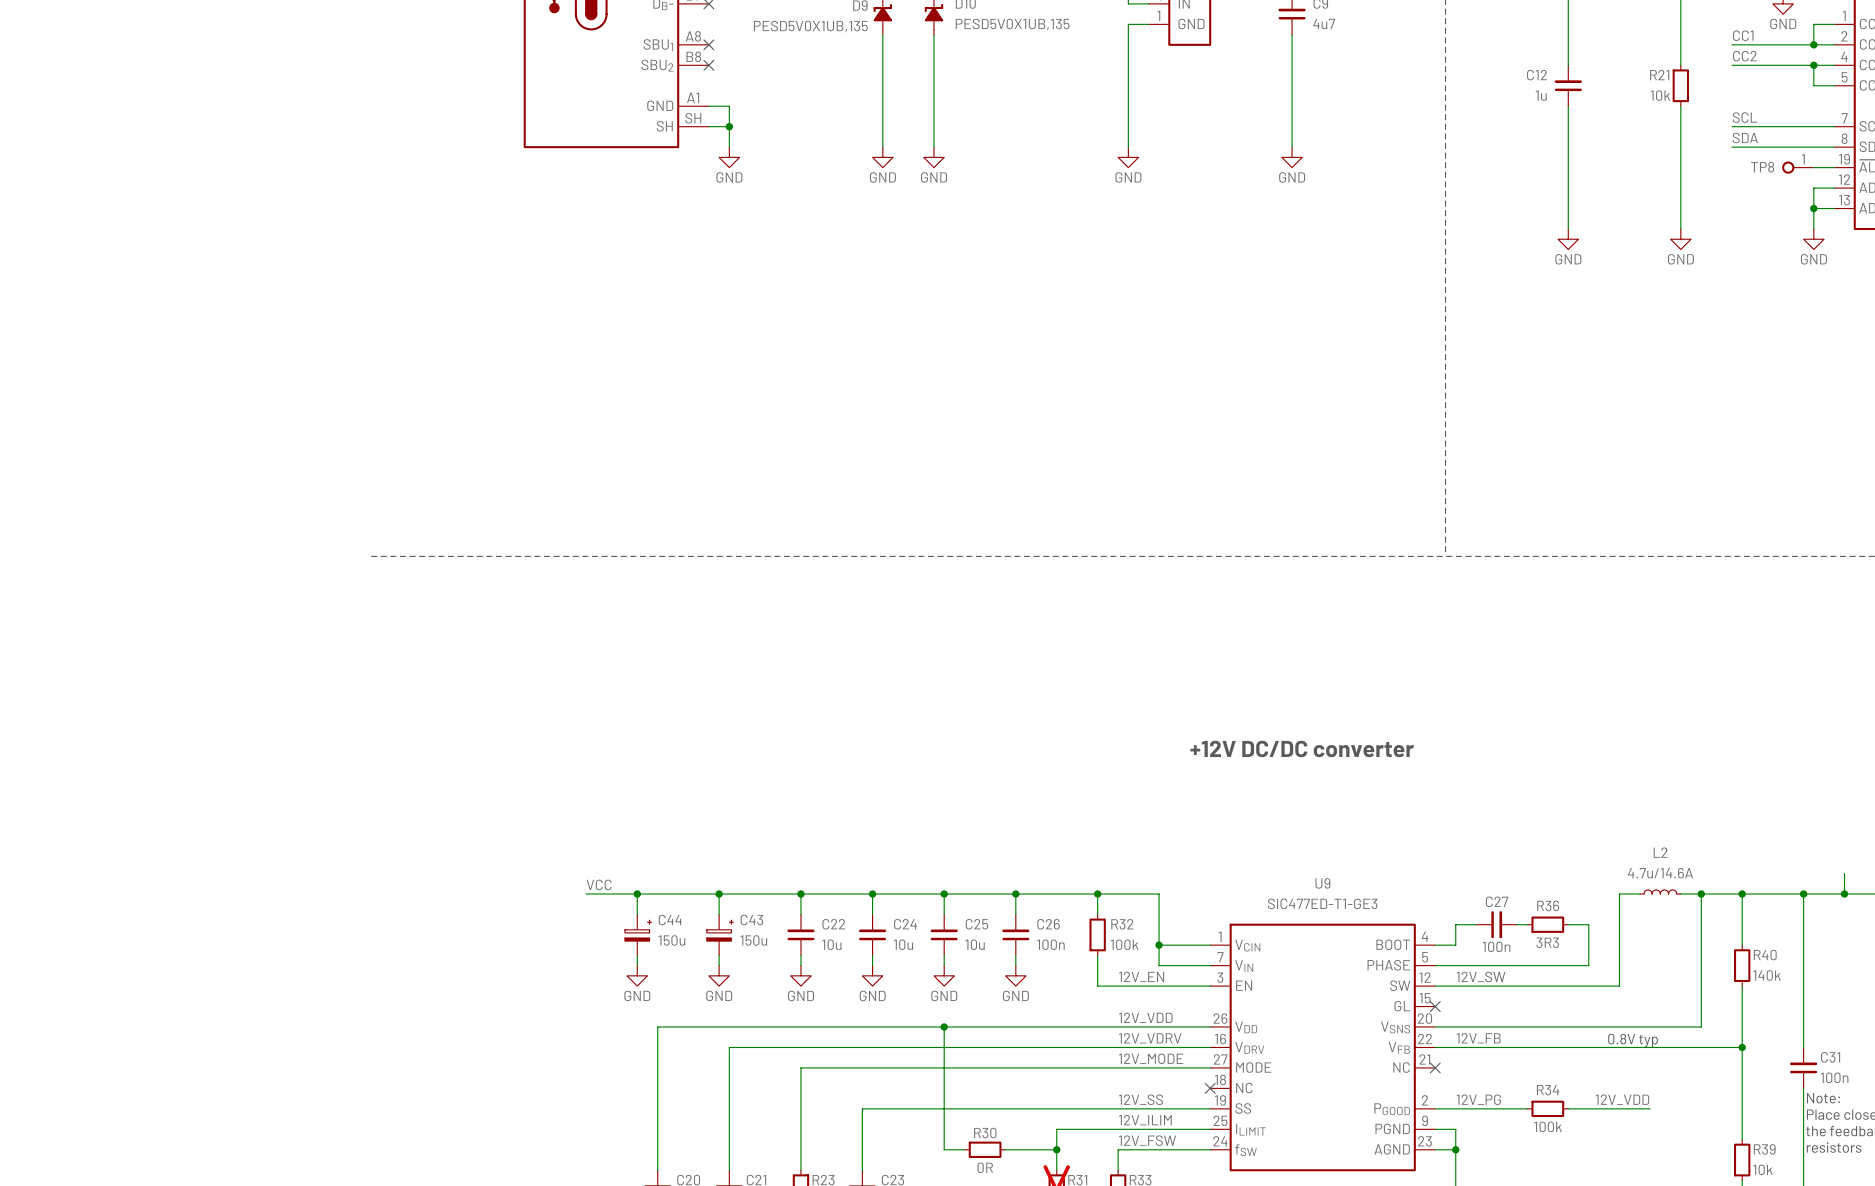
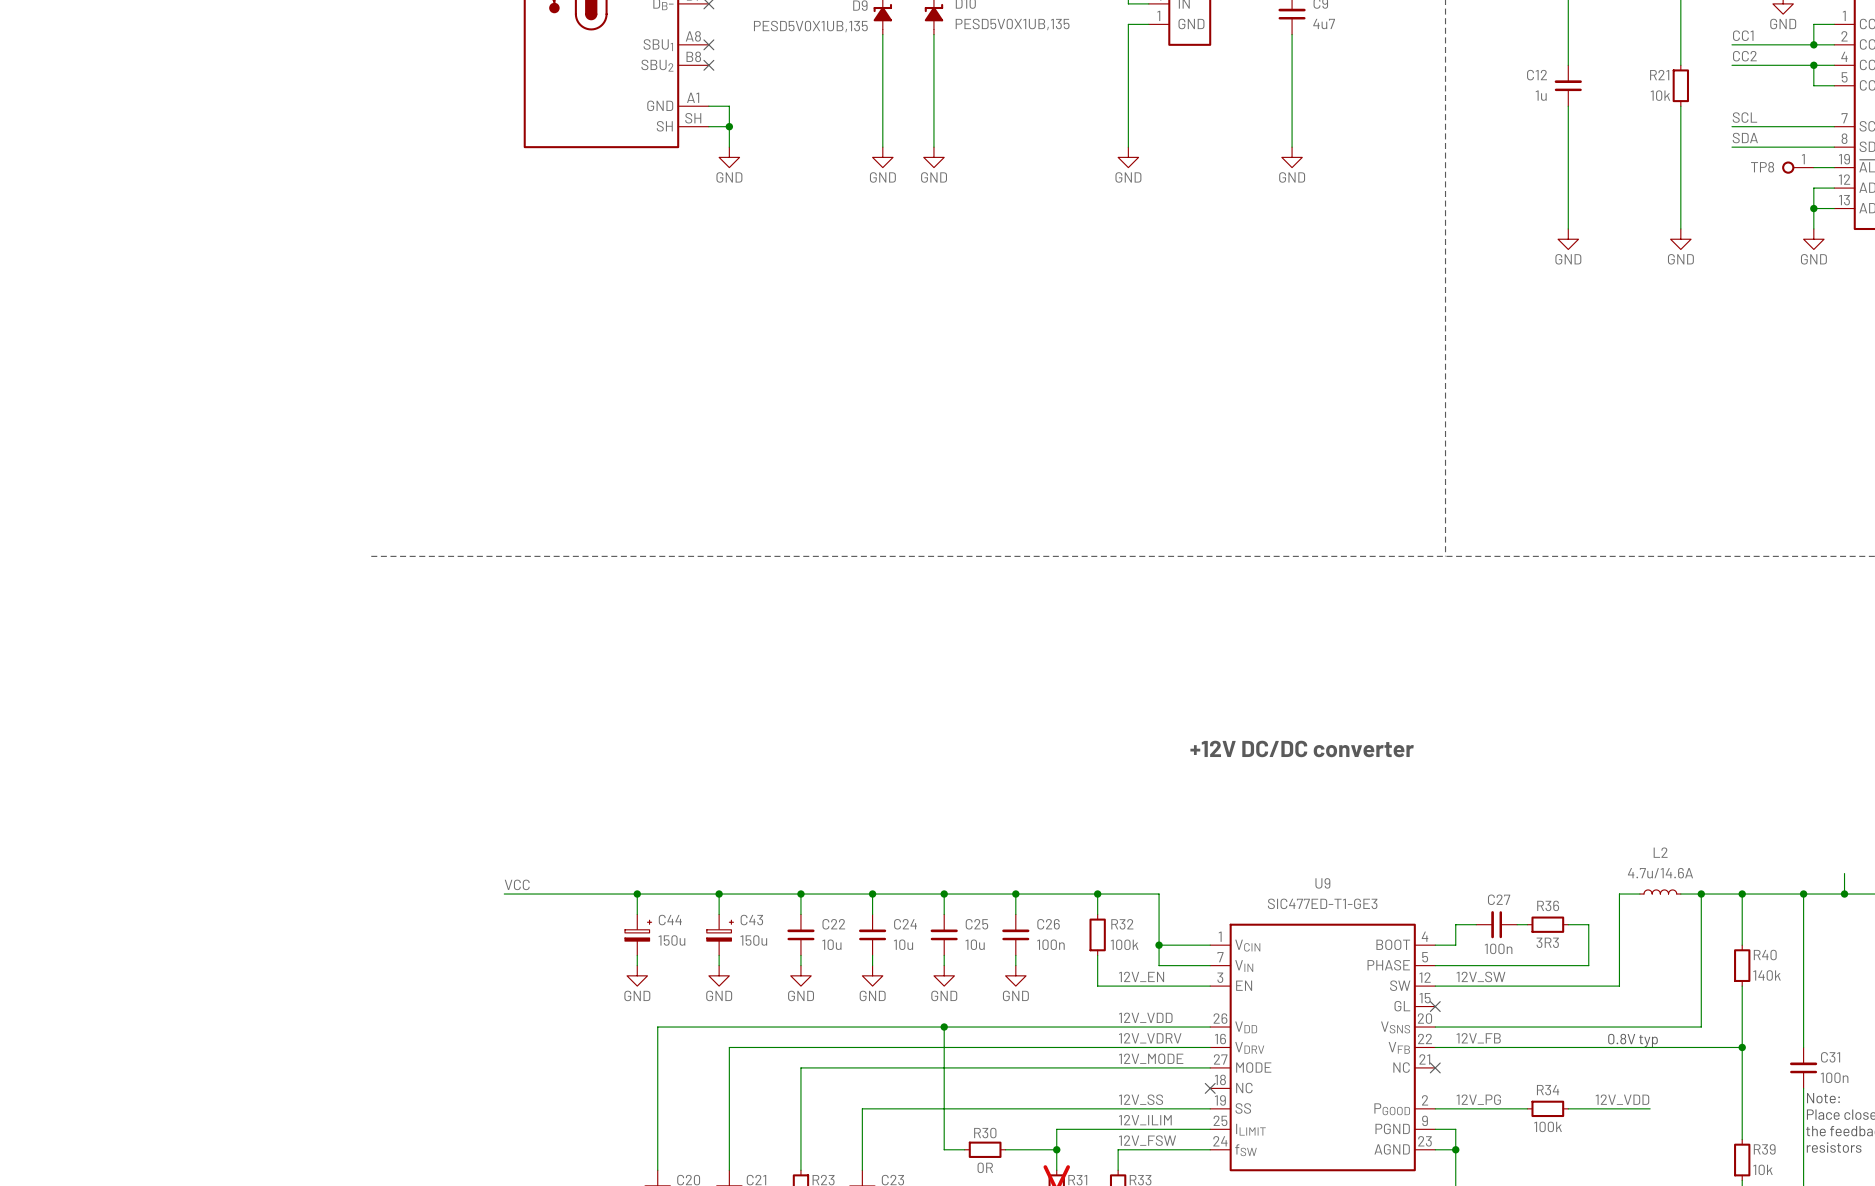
label position: VCC (599, 884) -> VCC (517, 884)
wire: none -> (504, 894) (586, 894)
C27 rotation: 0° (1496, 924) -> 180° (1496, 924)

